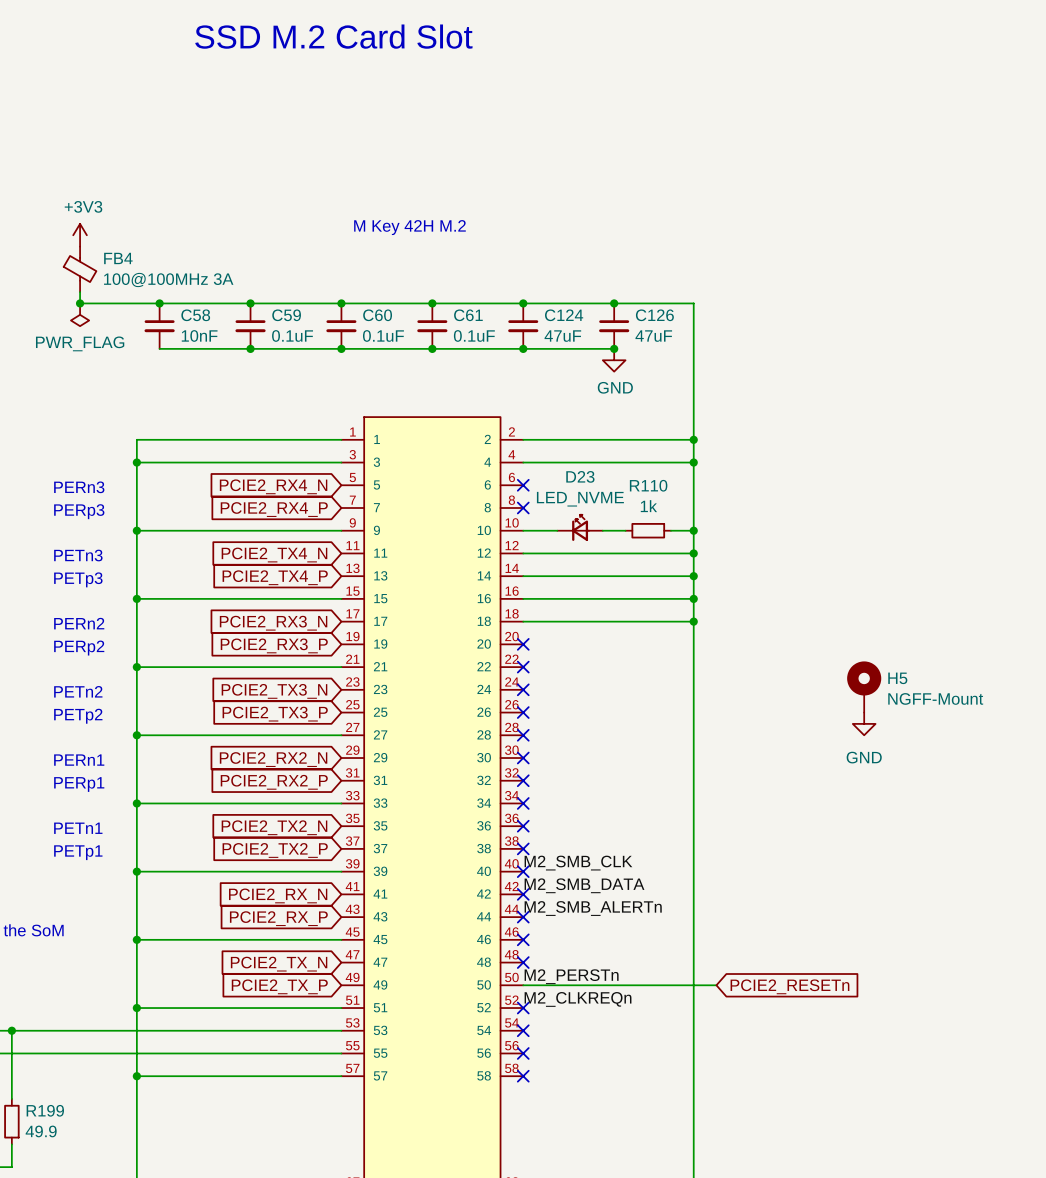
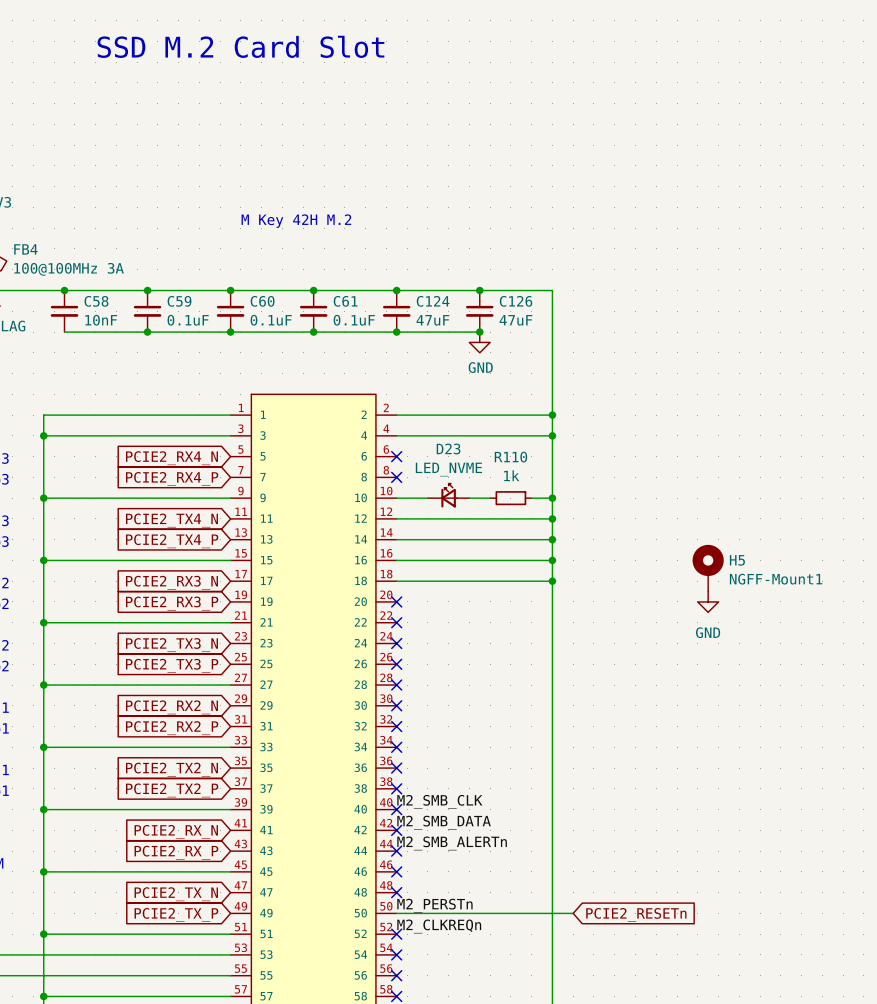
H5 position: (864, 686) -> (708, 568)
H5 value: NGFF-Mount (935, 698) -> NGFF-Mount1 (776, 579)
power symbol position: GND (864, 723) -> GND (708, 601)

